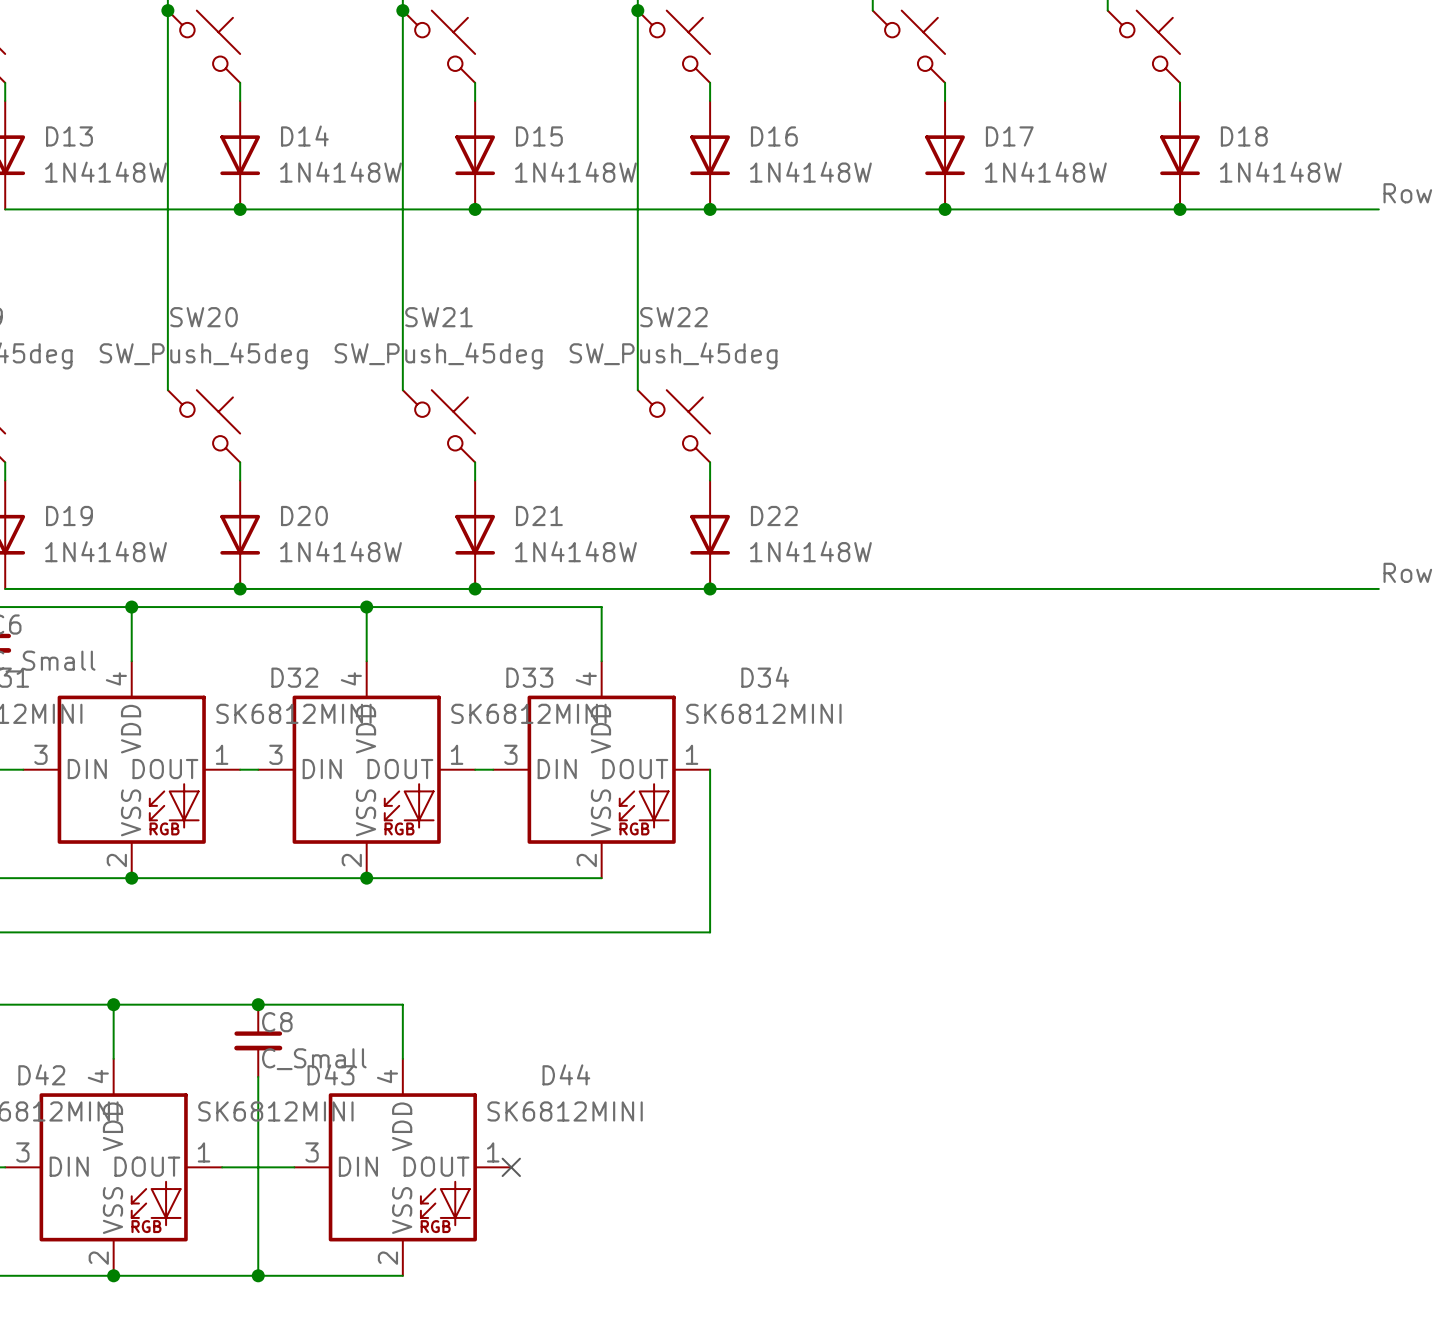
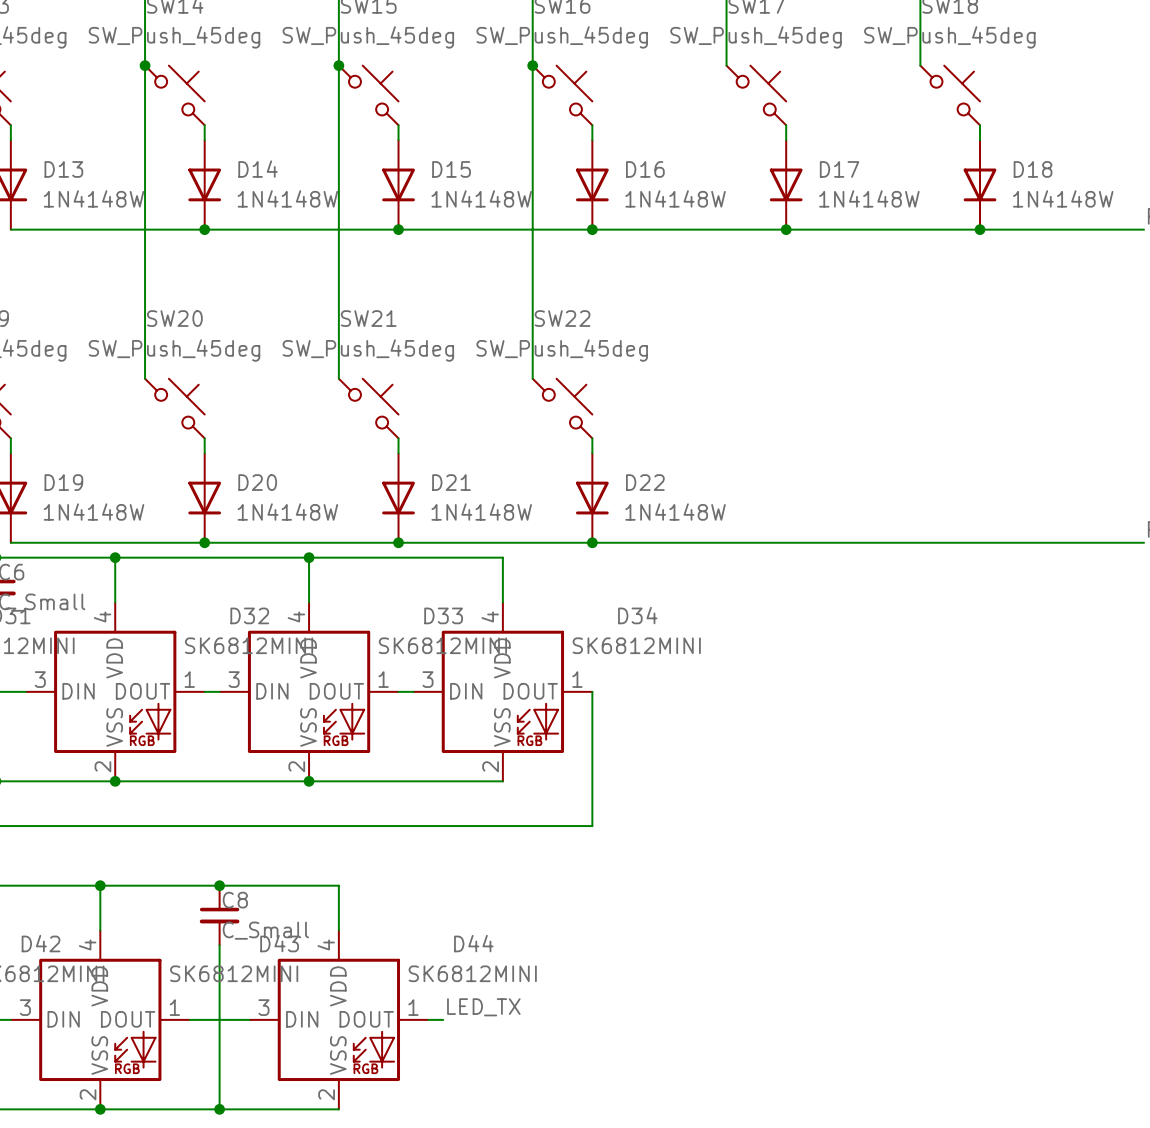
label: none -> LED_TX (483, 1007)
wire: none -> (428, 1019) (443, 1019)
no-connect mark: (511, 1167) -> none

